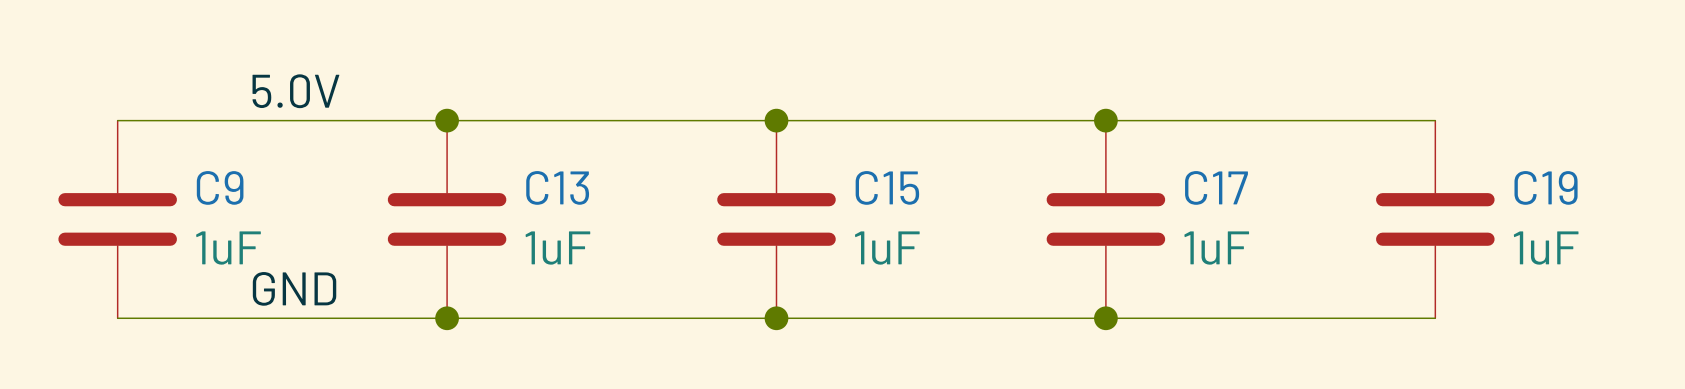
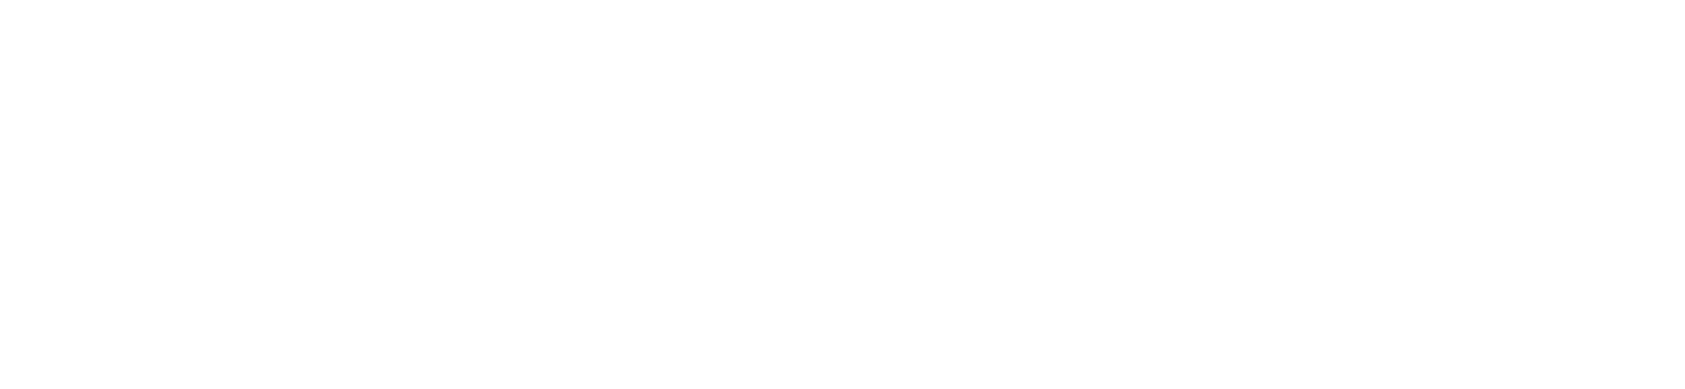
label: 5.0V (295, 91) -> none
wire: (117, 120) (1435, 120) -> none
junction: (447, 120) -> none
junction: (776, 120) -> none
junction: (1105, 120) -> none
C9: 1uF (117, 219) -> none
C13: 1uF (447, 219) -> none
C15: 1uF (776, 219) -> none
C17: 1uF (1105, 219) -> none
C19: 1uF (1435, 219) -> none
label: GND (294, 288) -> none
wire: (117, 318) (1435, 318) -> none
junction: (447, 318) -> none
junction: (776, 318) -> none
junction: (1105, 318) -> none

